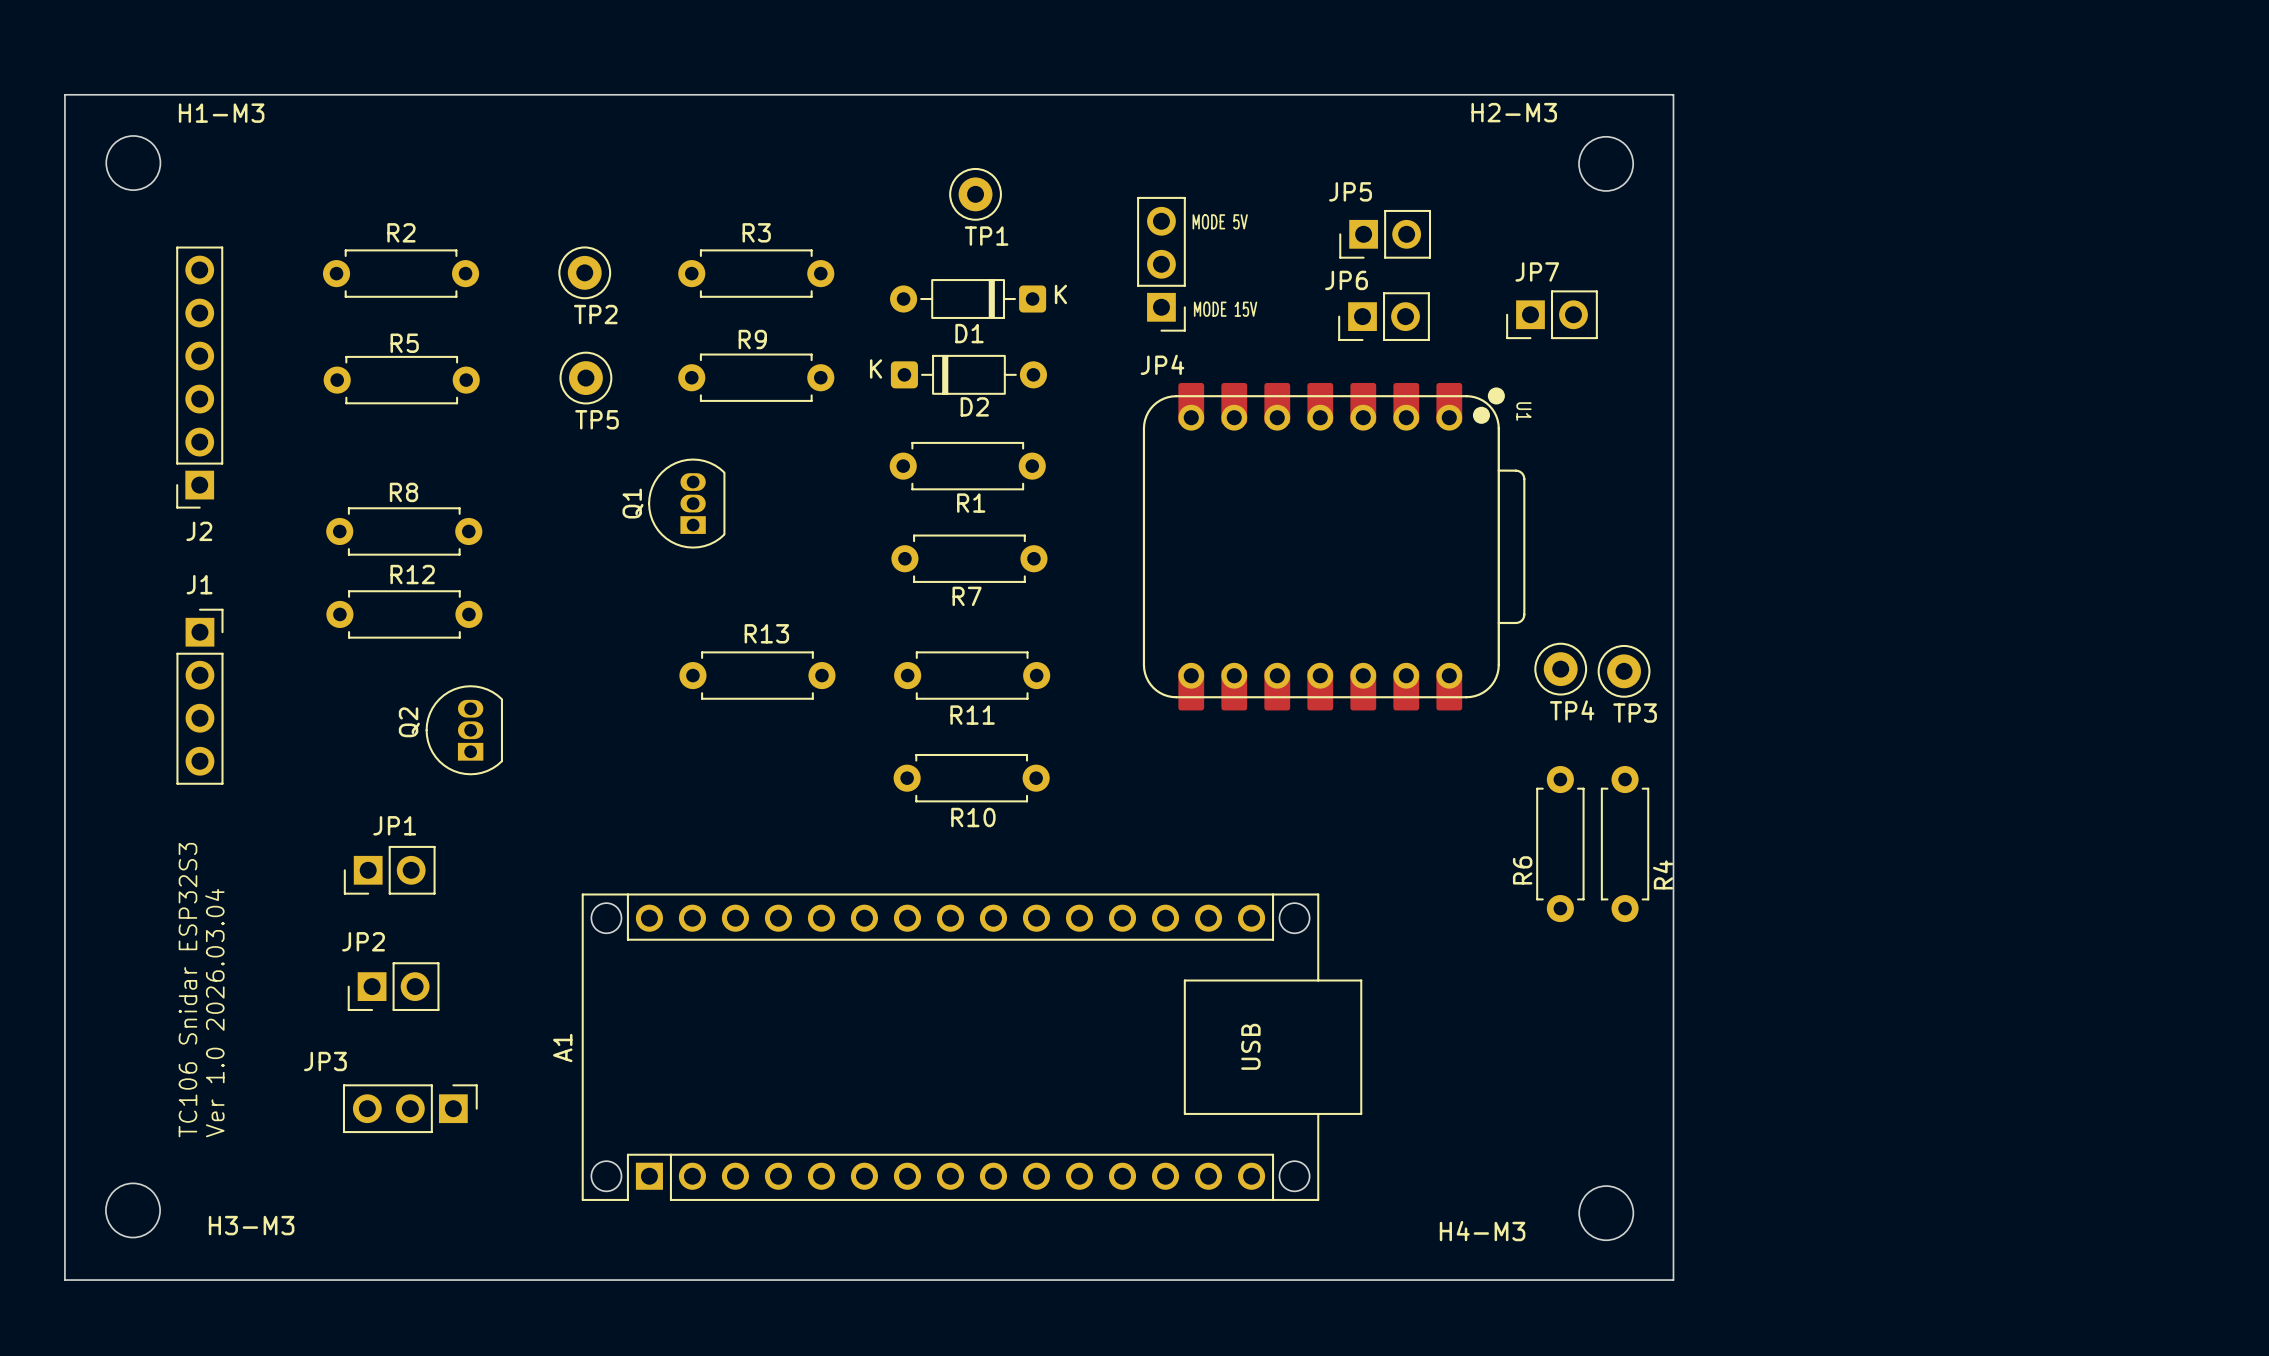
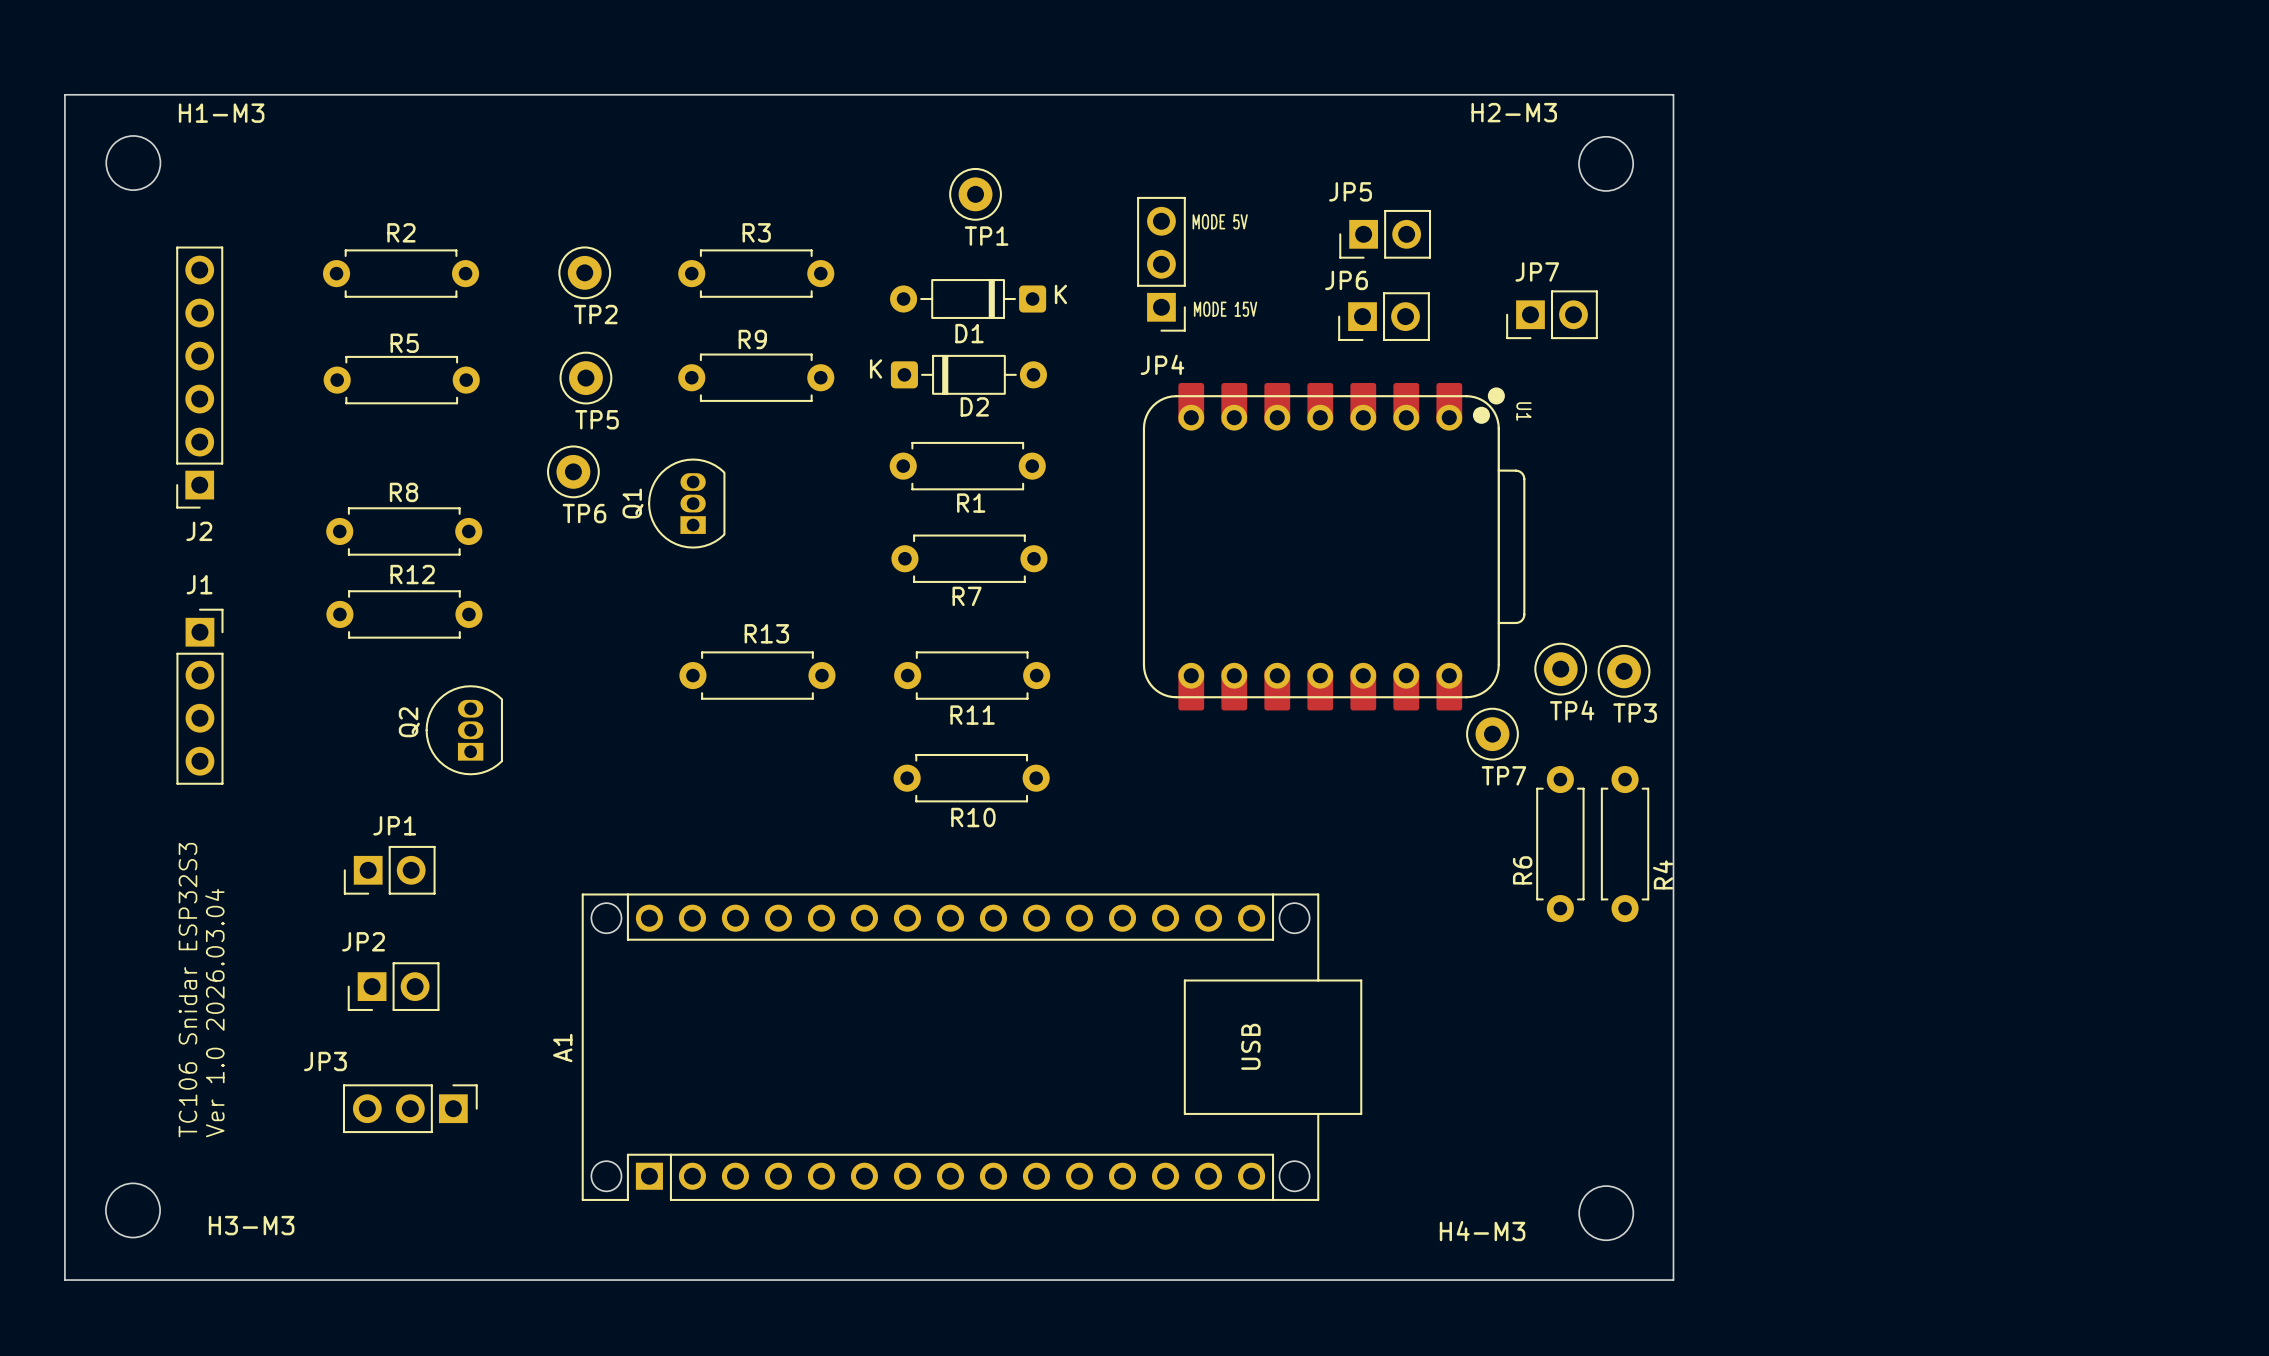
TP6: none -> (573, 471)
TP7: none -> (1492, 734)

